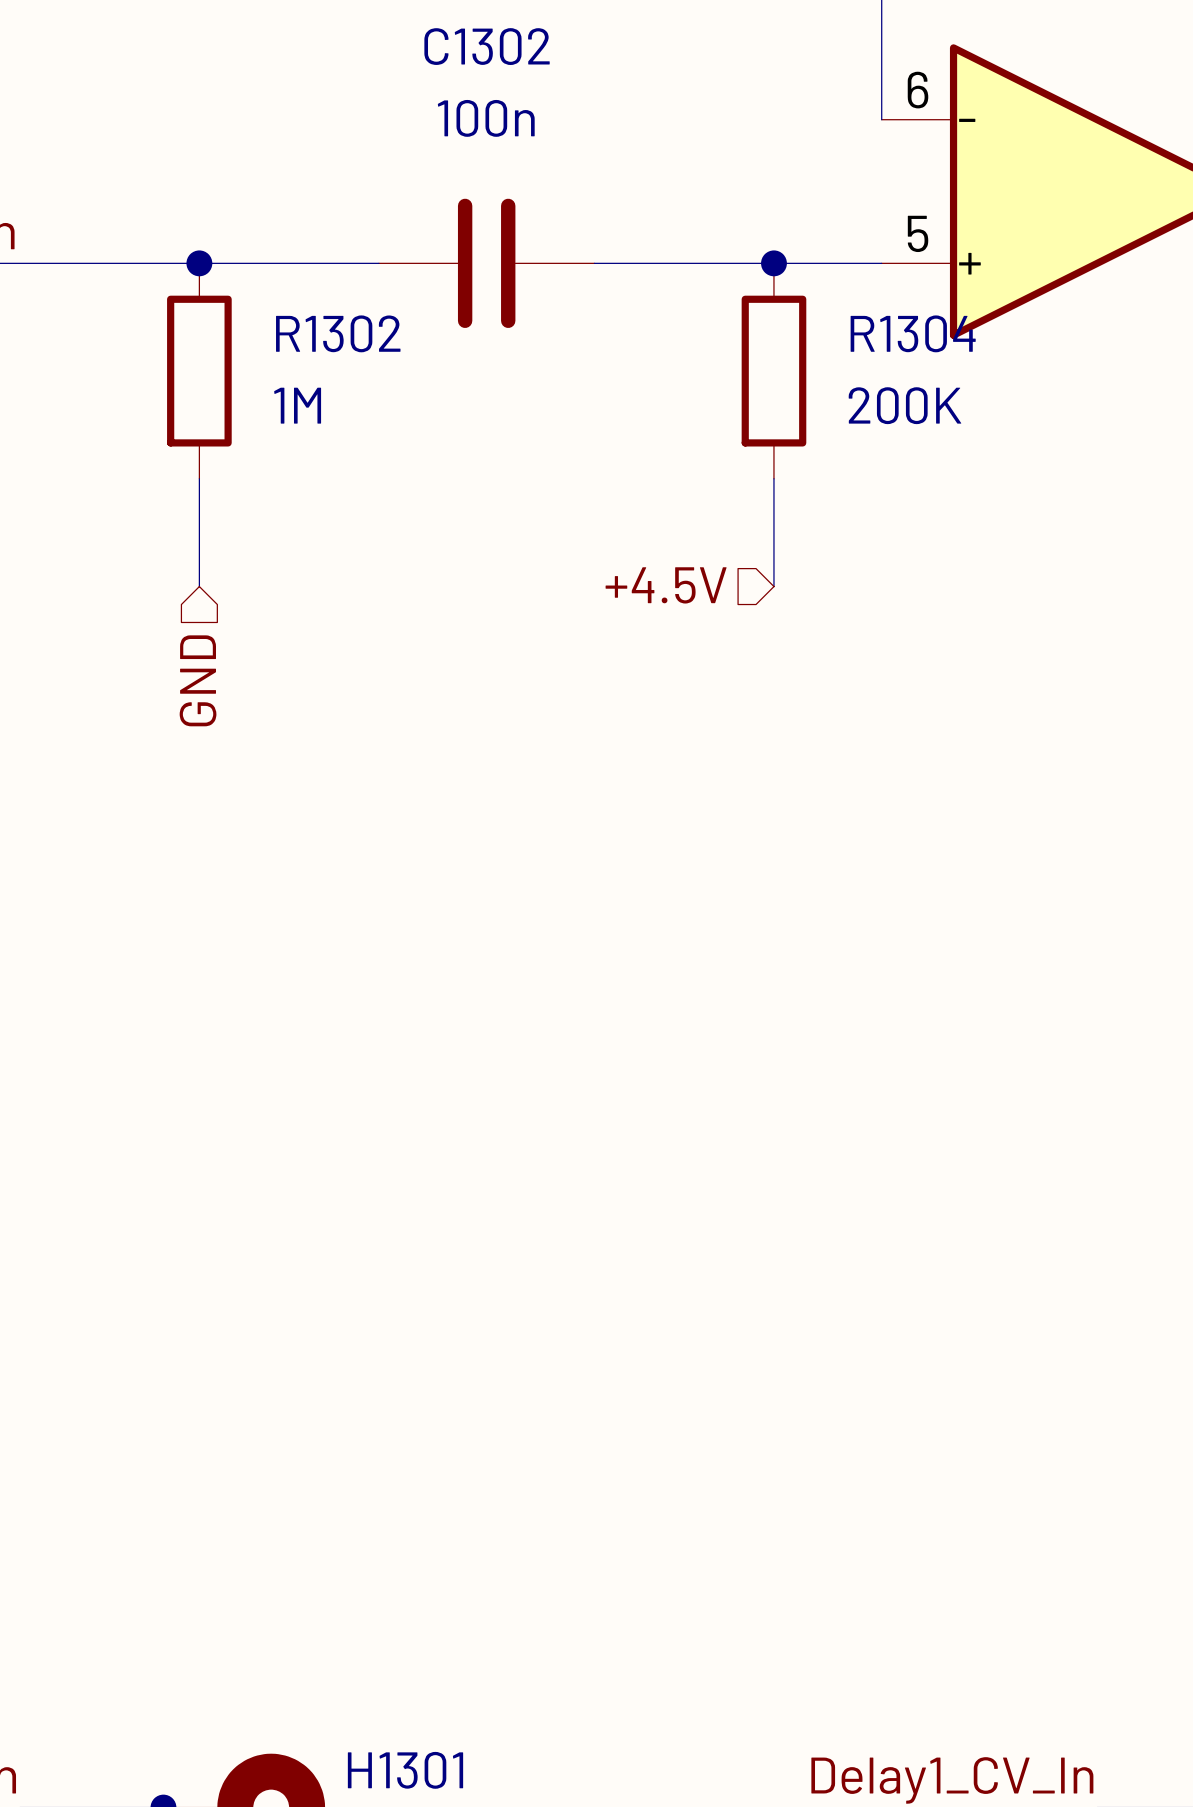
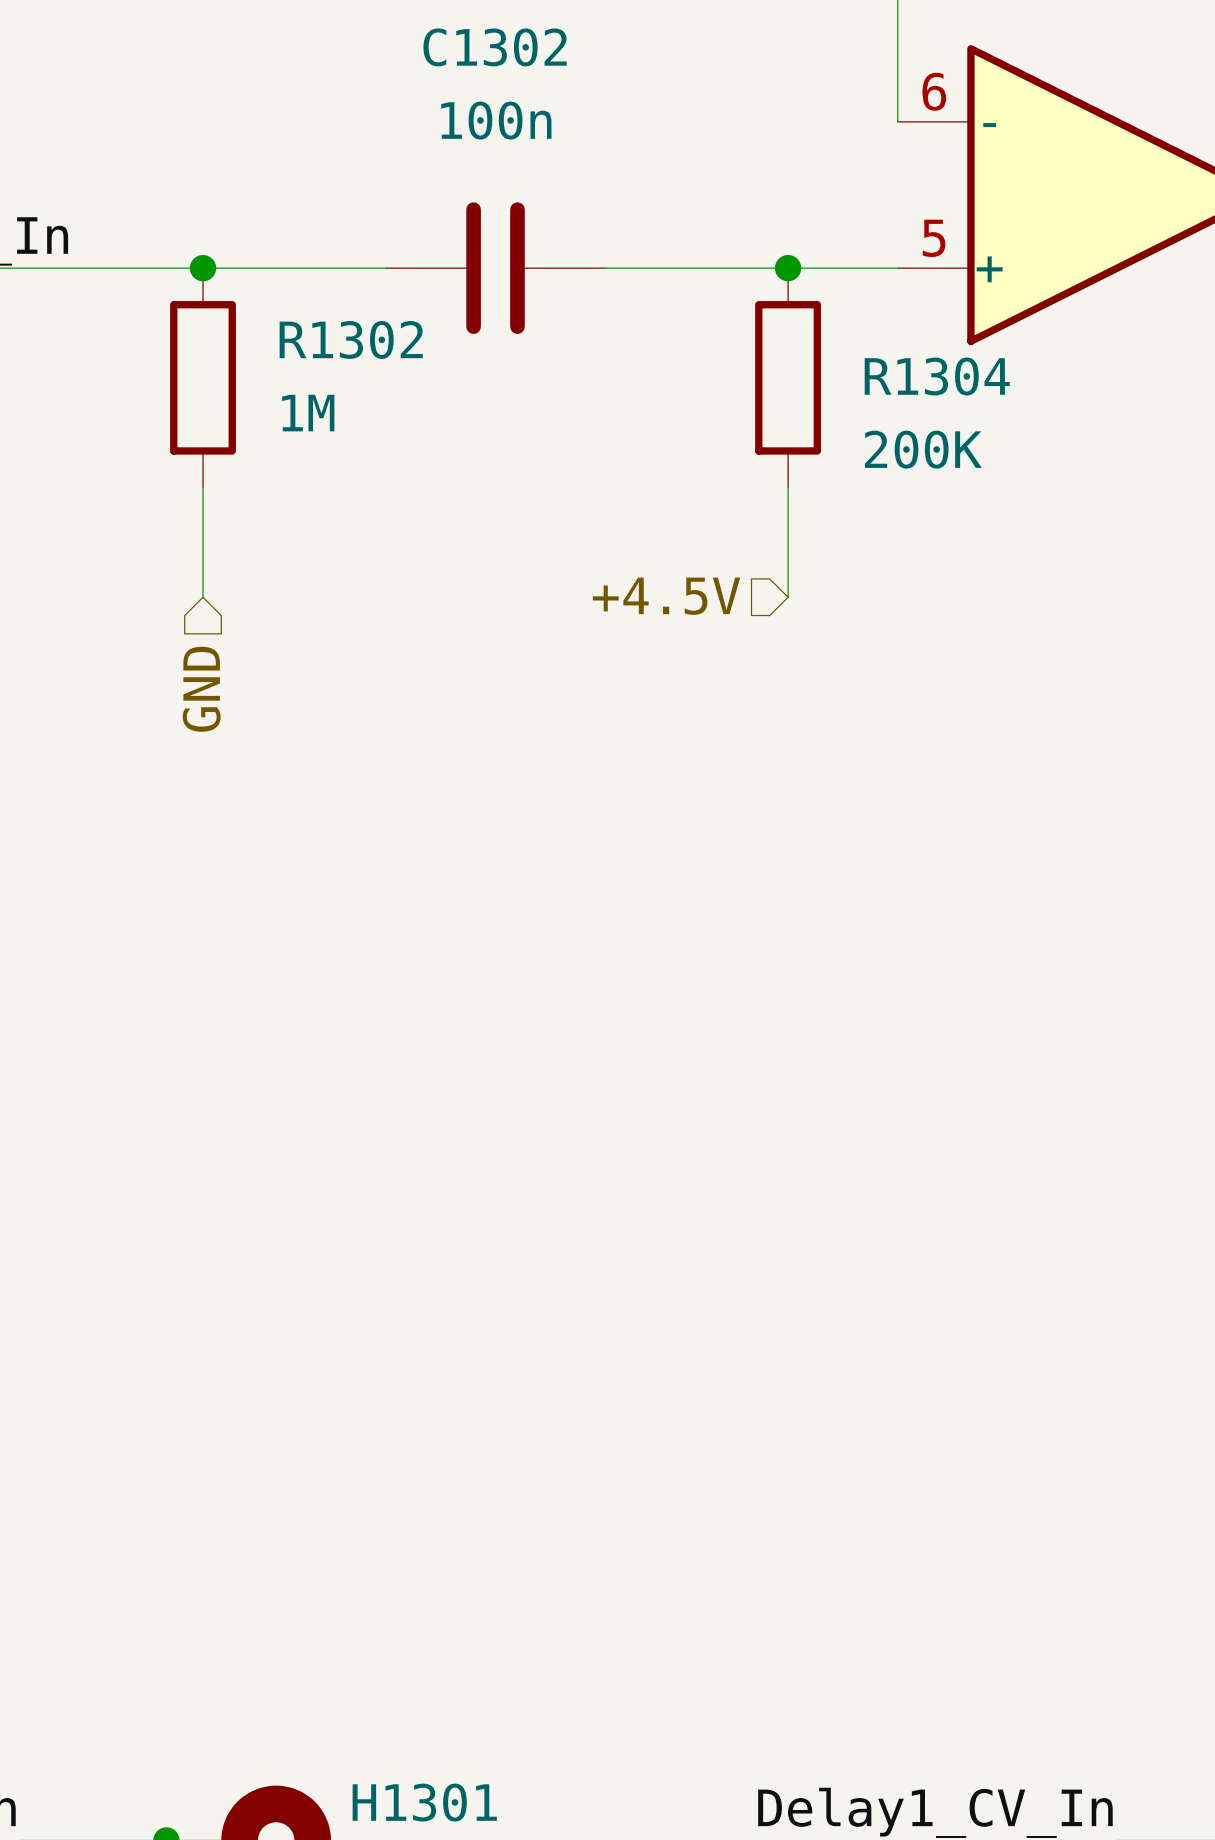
R1304 name position: R1304 (913, 333) -> R1304 (937, 376)
R1304 value position: 200K (904, 405) -> 200K (923, 449)

